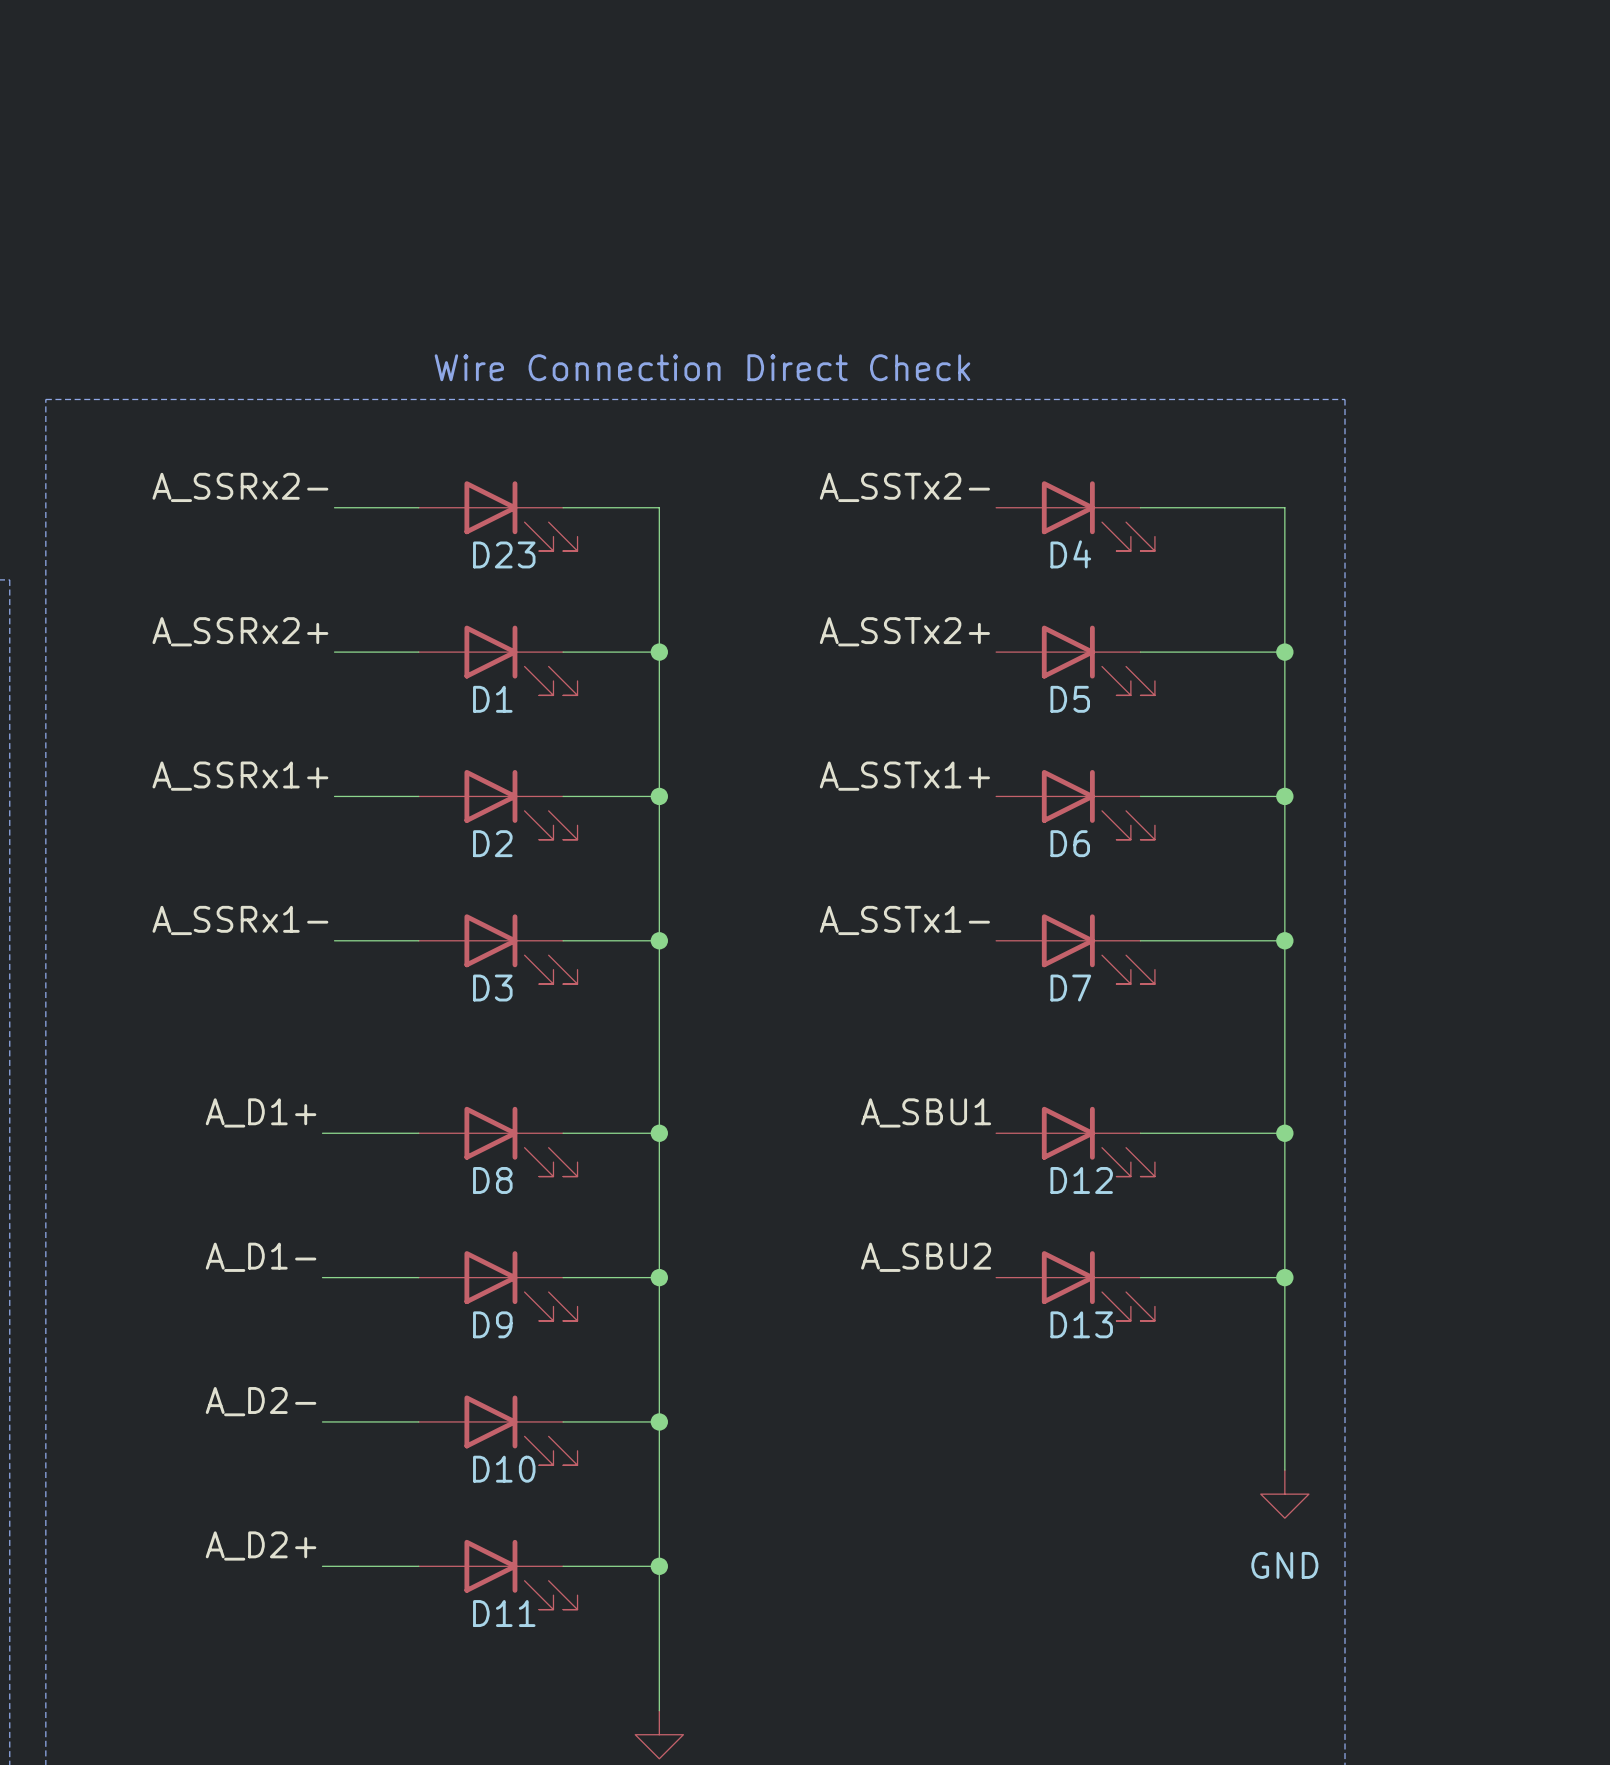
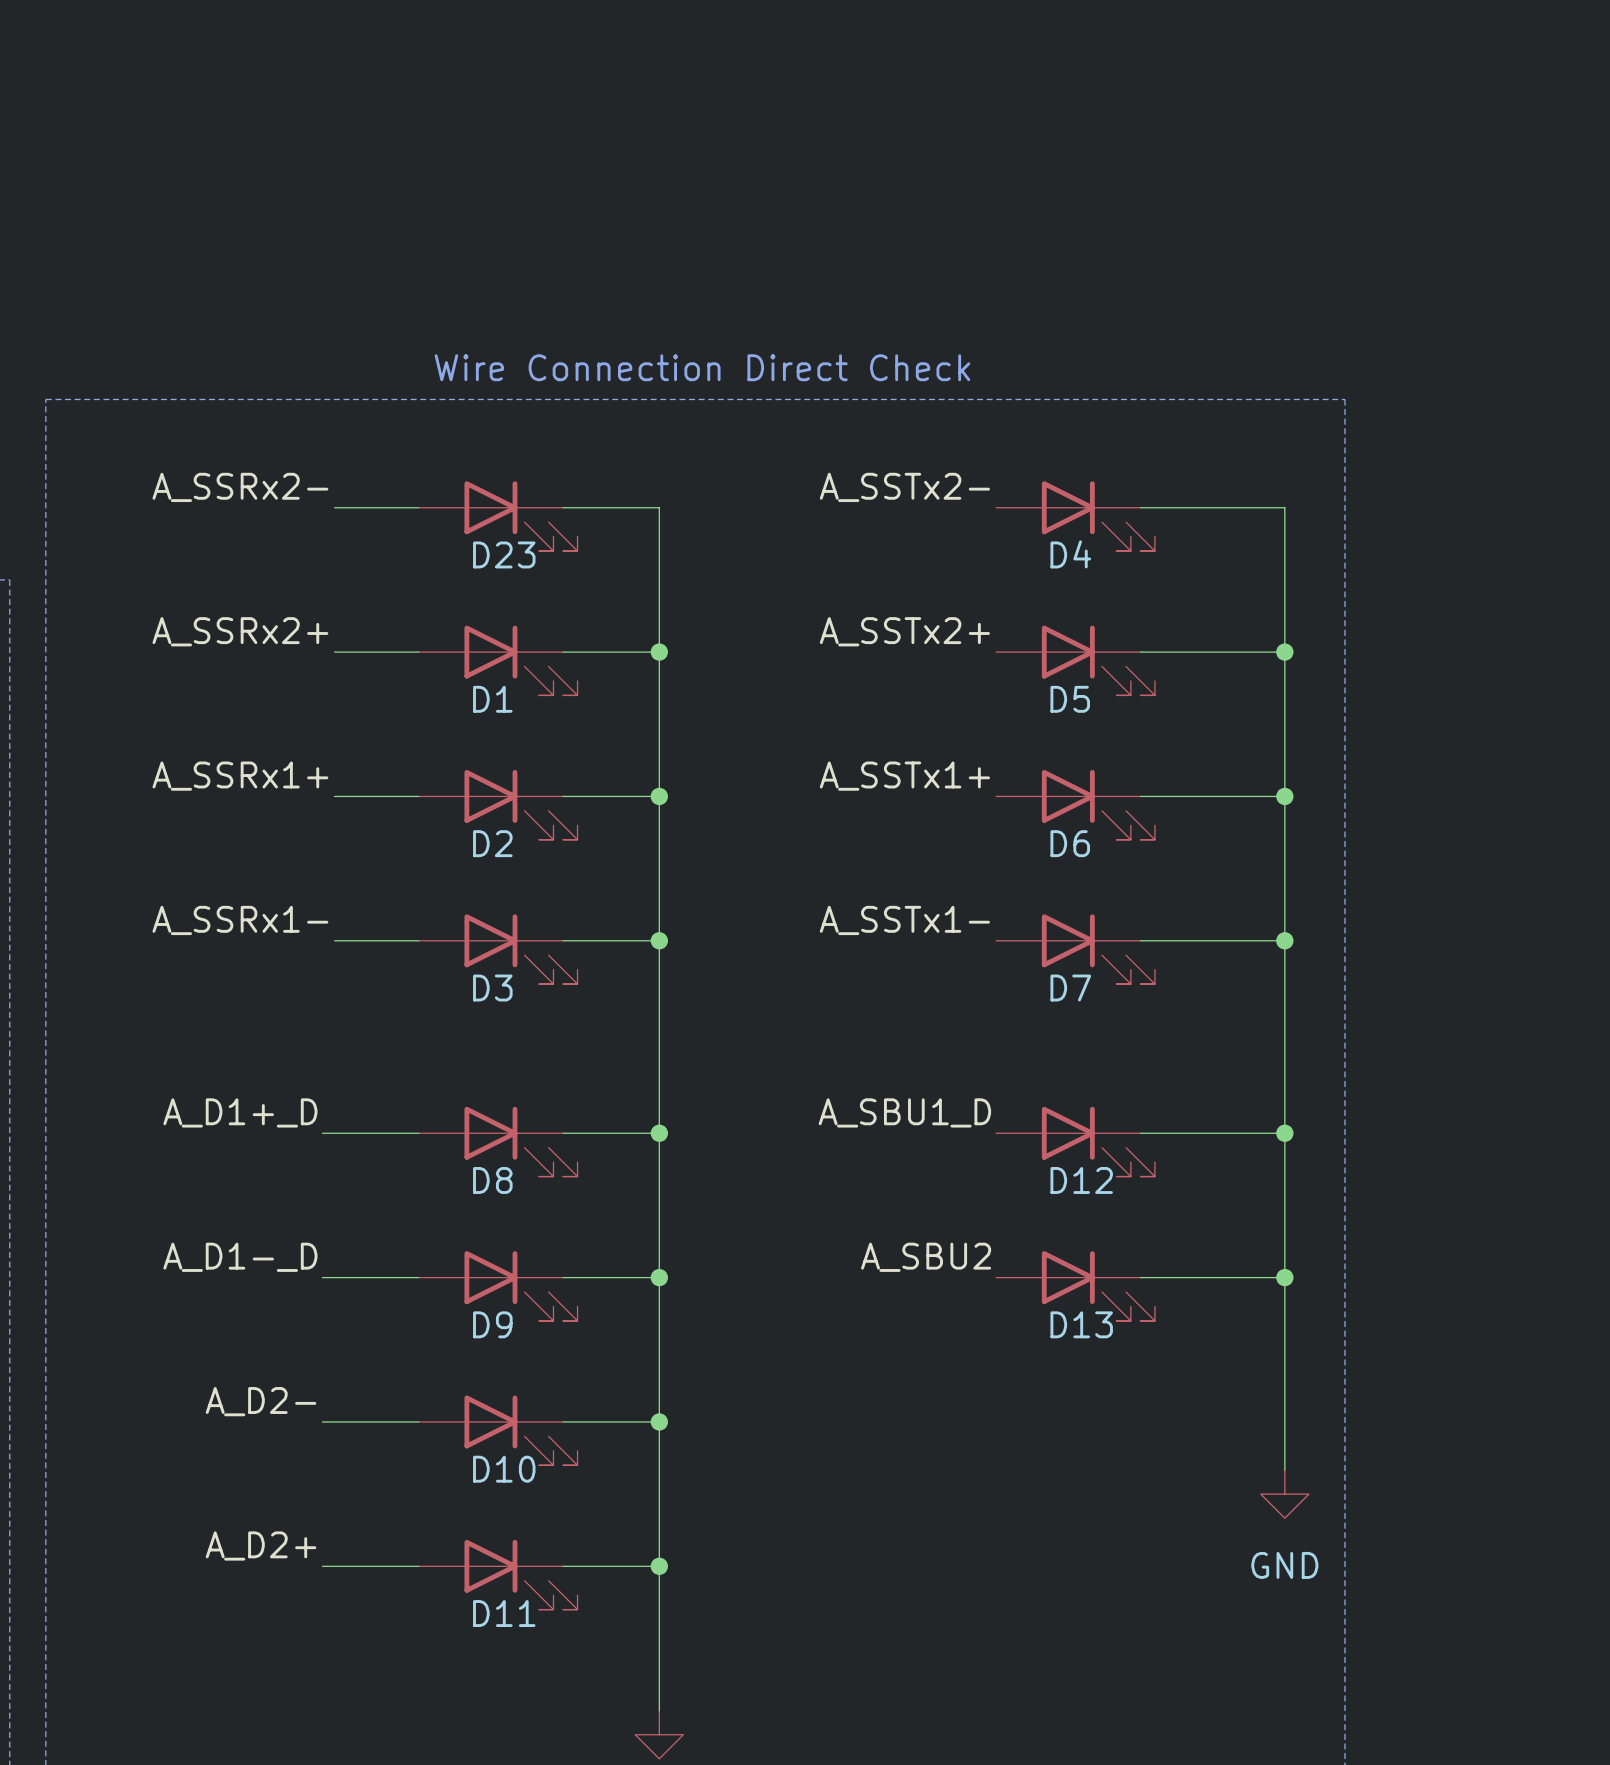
label: A_D1+ (261, 1112) -> A_D1+_D (240, 1112)
label: A_SBU1 (926, 1112) -> A_SBU1_D (904, 1112)
label: A_D1- (261, 1257) -> A_D1-_D (240, 1257)

